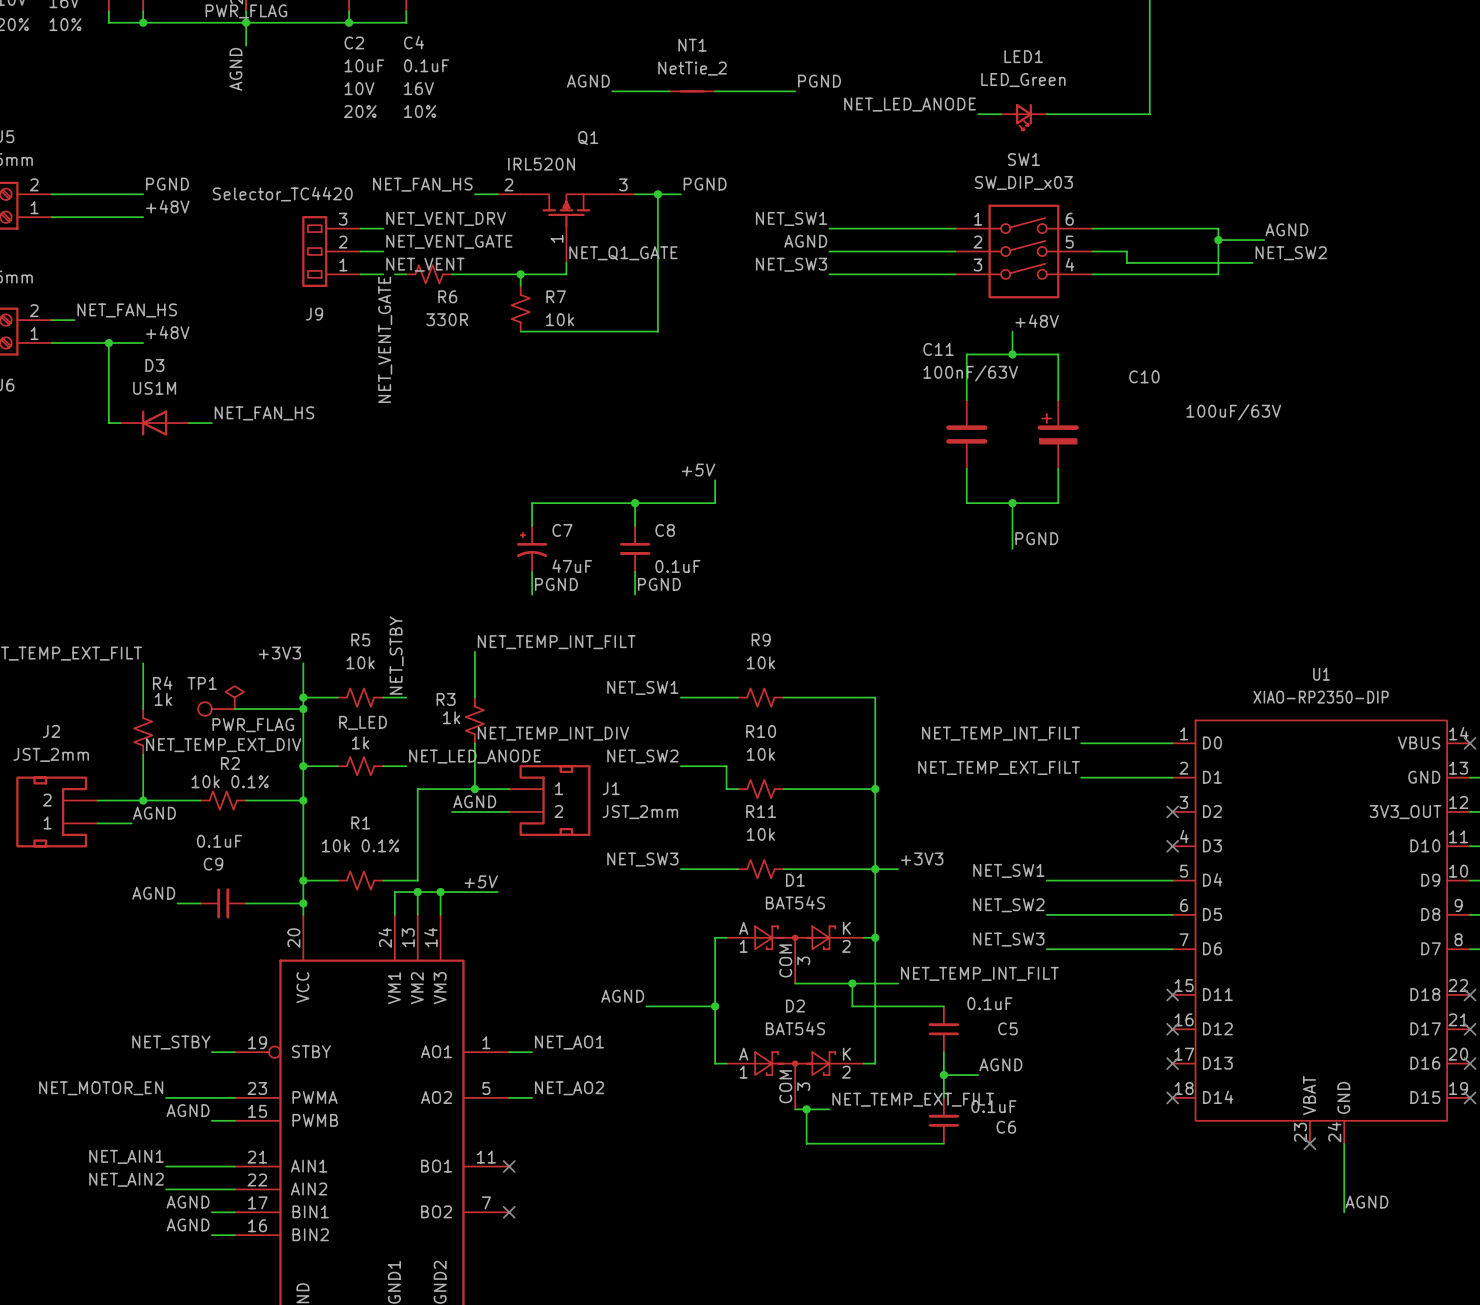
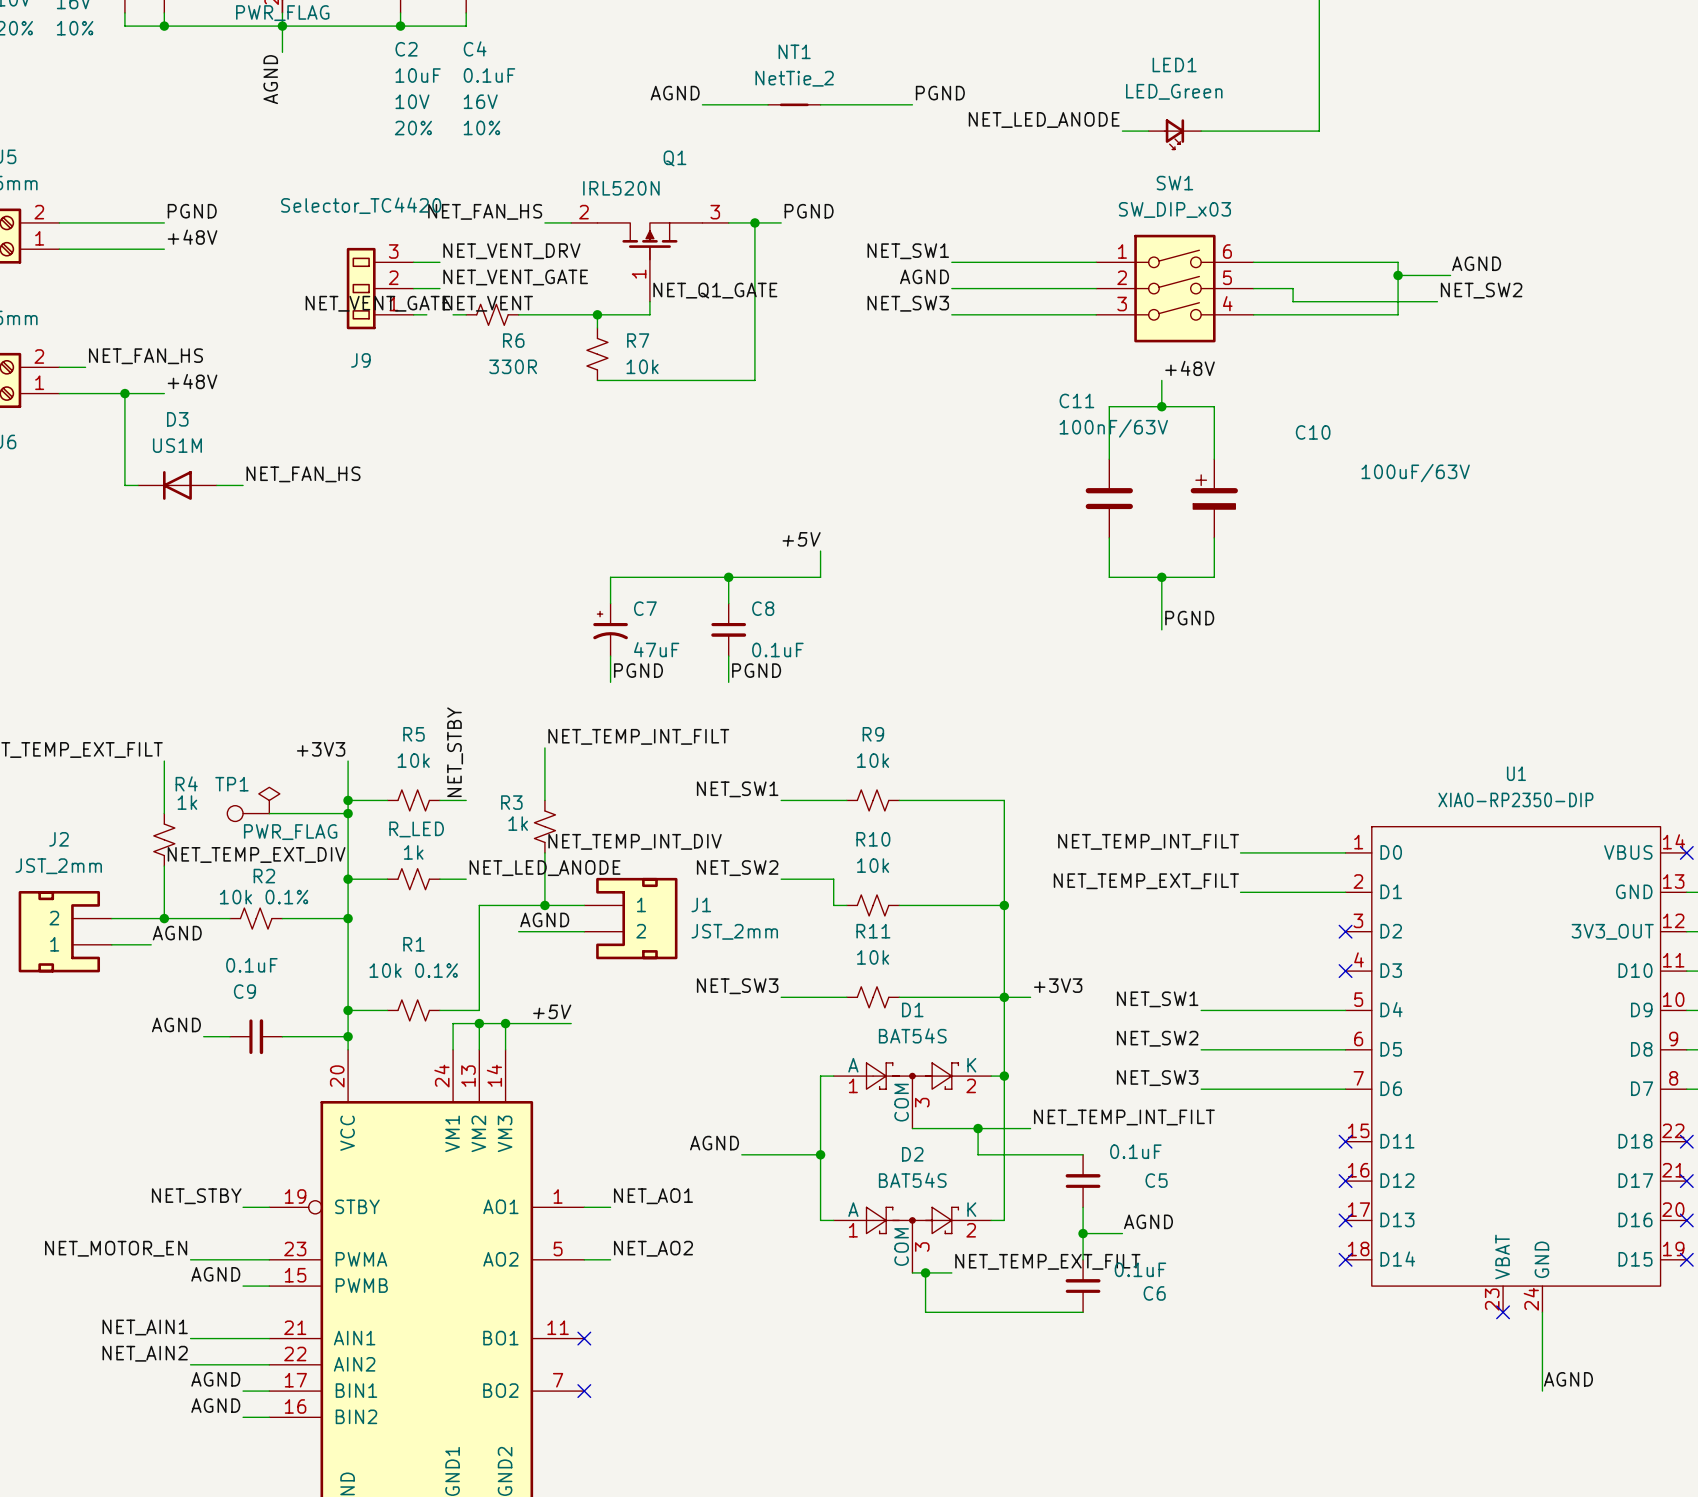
J9 value position: Selector_TC4420 (282, 194) -> Selector_TC4420 (361, 205)
wire: (371, 274) (383, 274) -> none
label rotation: 0° (385, 339) -> 90° clockwise (377, 303)

